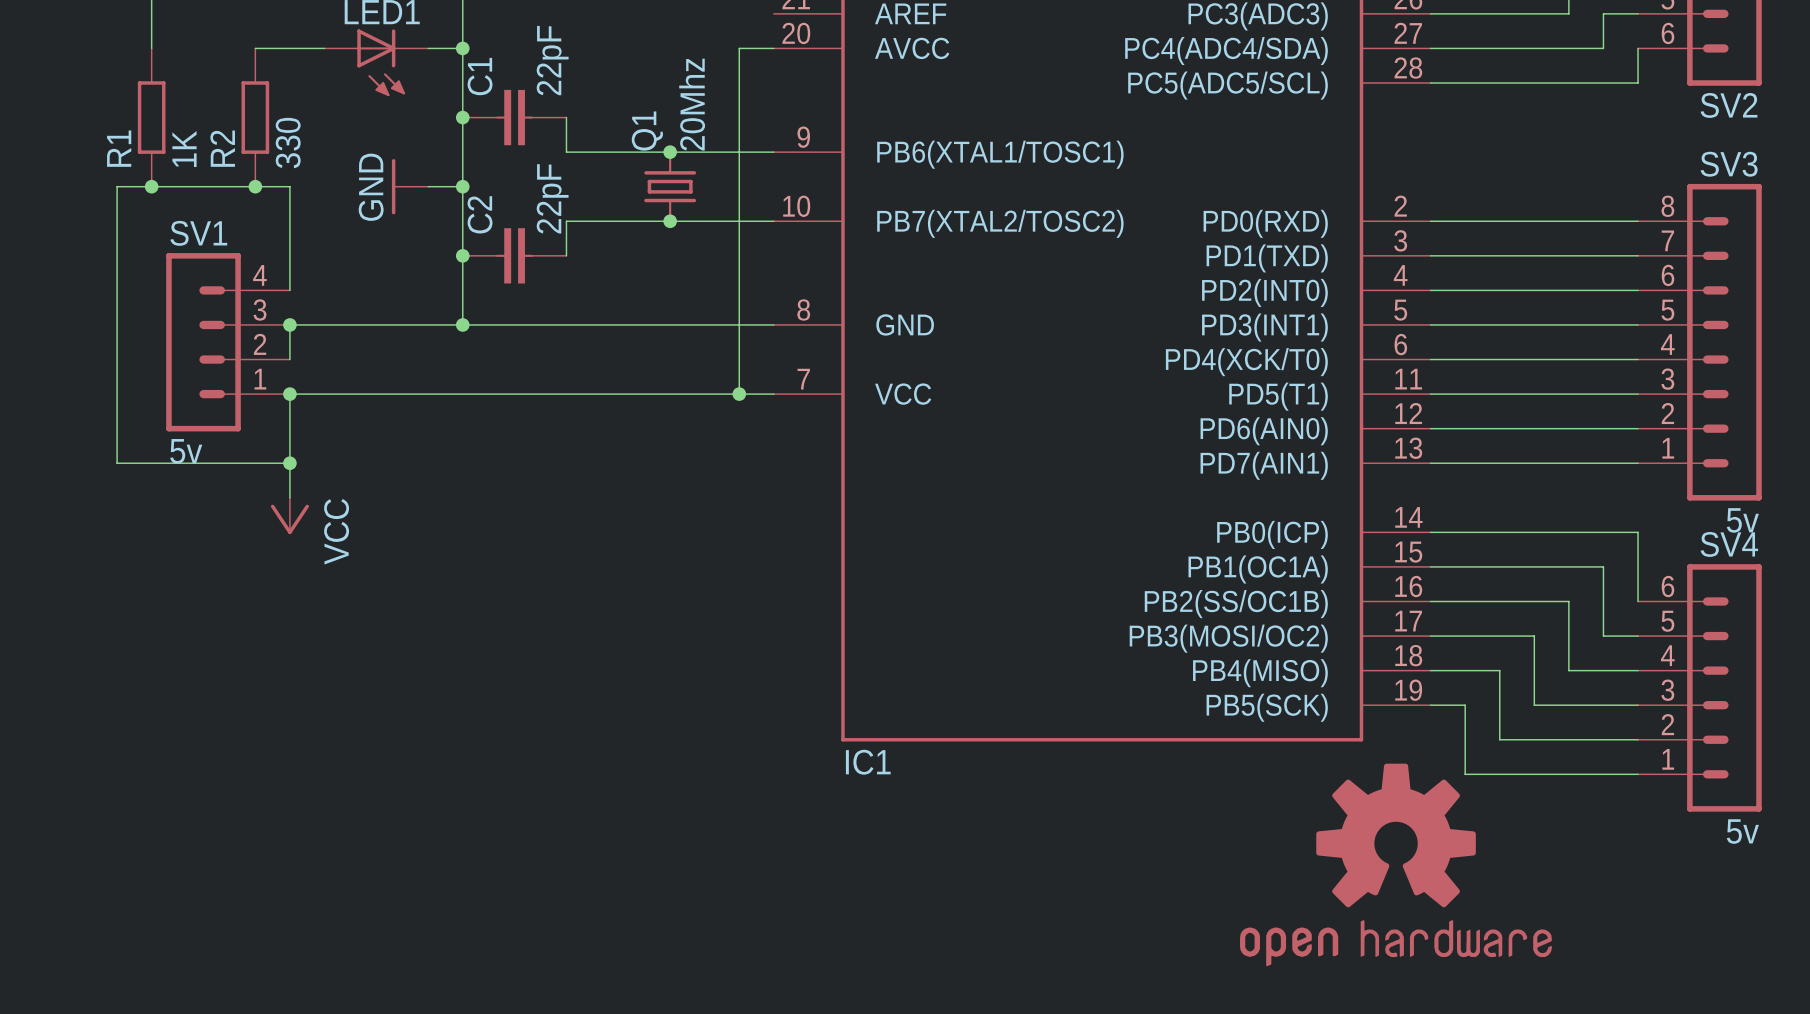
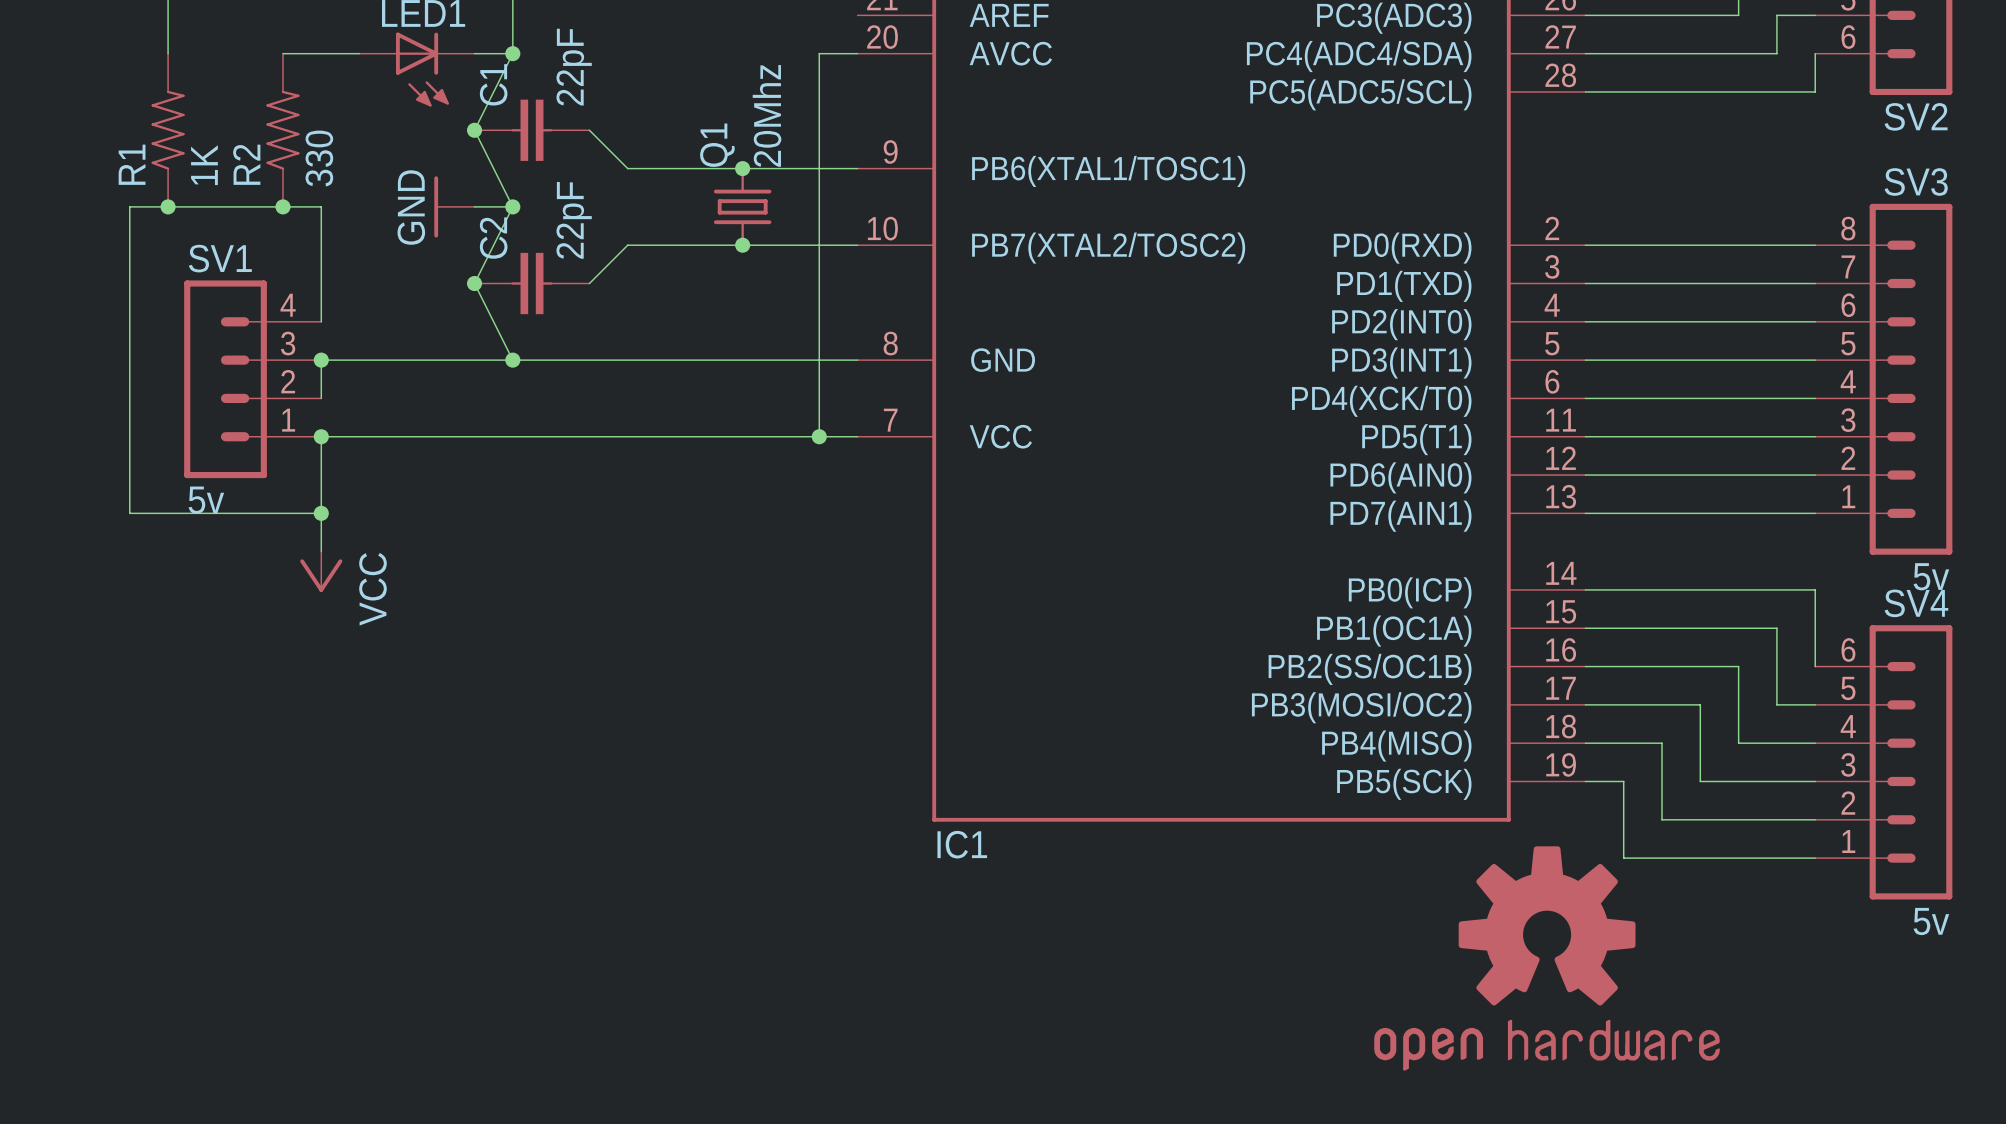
R1 symbol: [137, 48, 166, 187] -> [151, 53, 185, 207]
R2 symbol: [241, 48, 270, 187] -> [266, 53, 300, 207]
wire: (462, 48) (462, 324) -> (512, 53) (474, 130) (512, 206) (474, 283) (512, 360)
junction position: (462, 117) -> (474, 130)
C1 position: (514, 117) -> (531, 130)
wire: (566, 117) (566, 152) -> (589, 130) (627, 168)
wire: (566, 221) (566, 255) -> (627, 245) (589, 283)
junction position: (462, 255) -> (474, 283)
C2 position: (514, 255) -> (531, 283)

